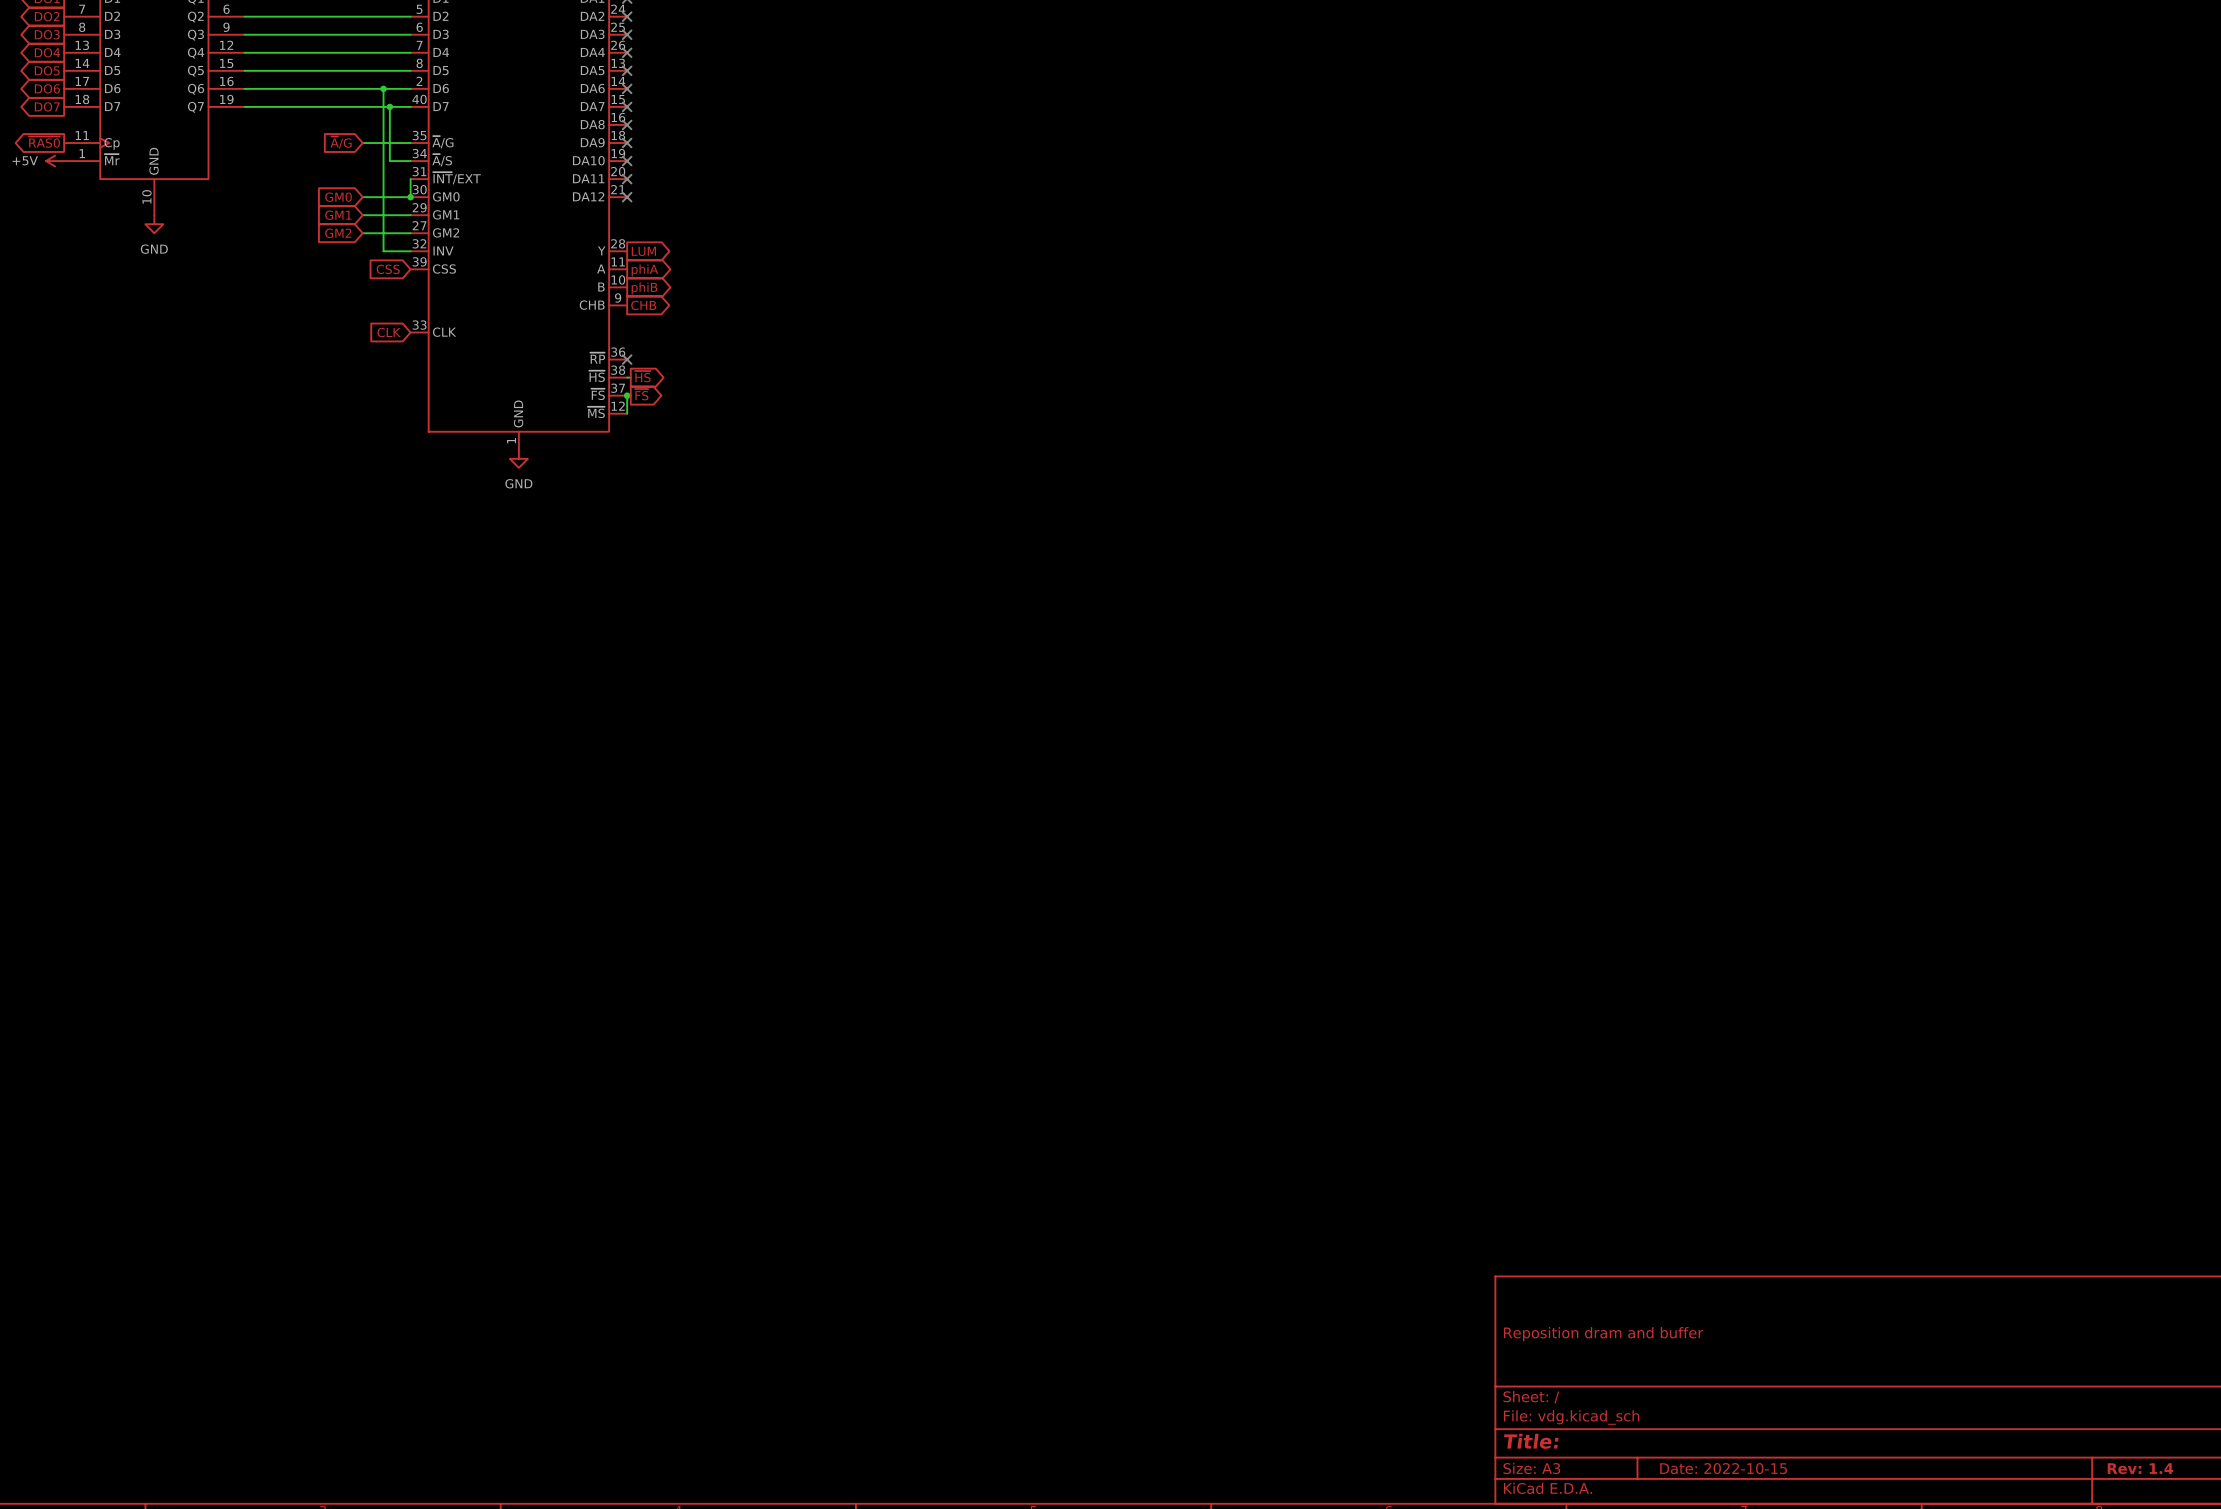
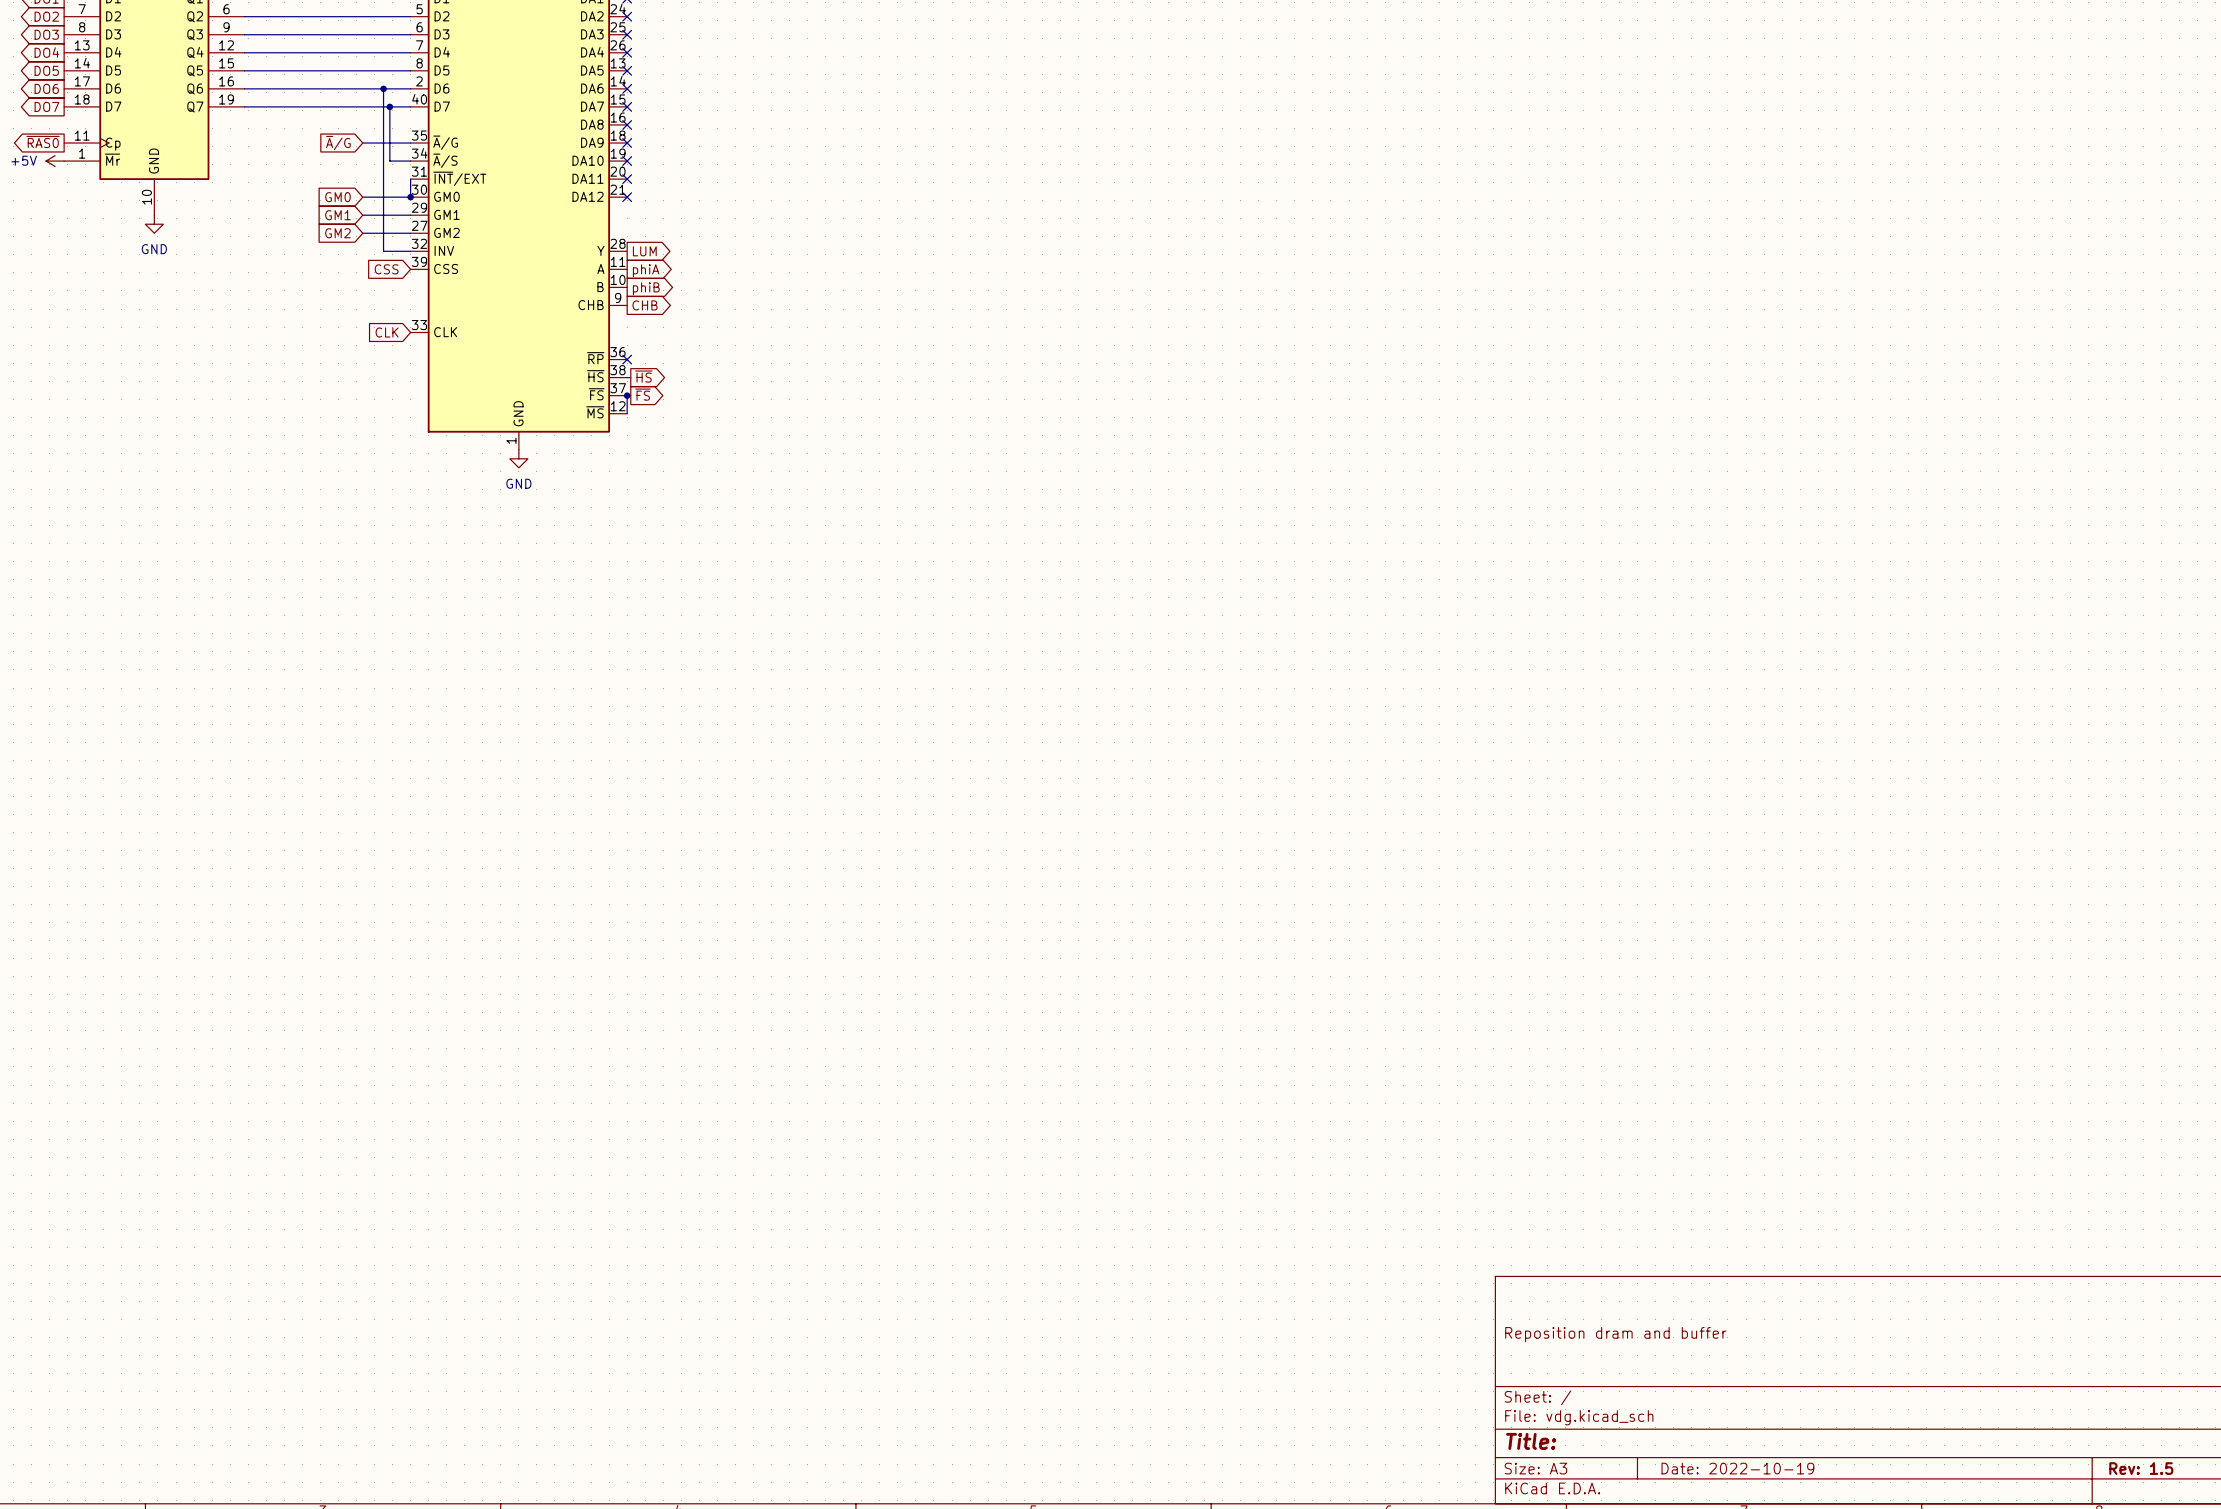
title block: Date: 2022-10-15 (1723, 1468) -> Date: 2022-10-19 (1737, 1468)
title block: Rev: 1.4 (2140, 1468) -> Rev: 1.5 (2141, 1468)

